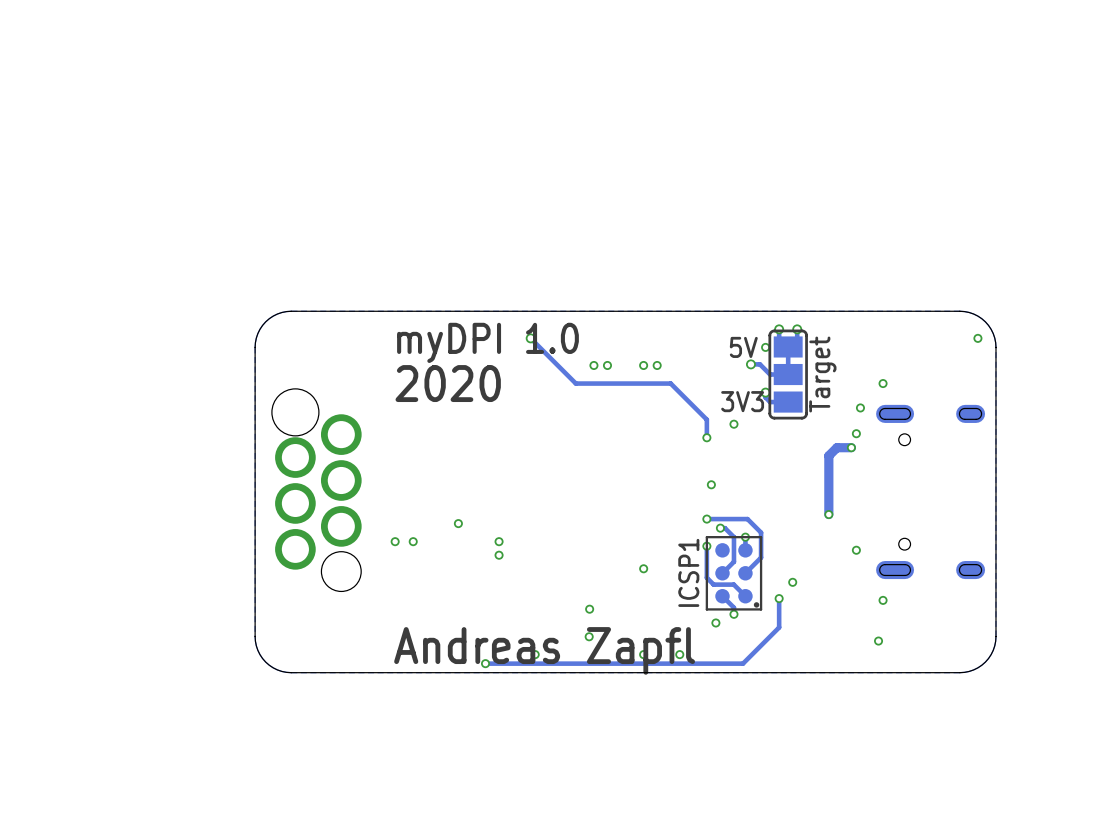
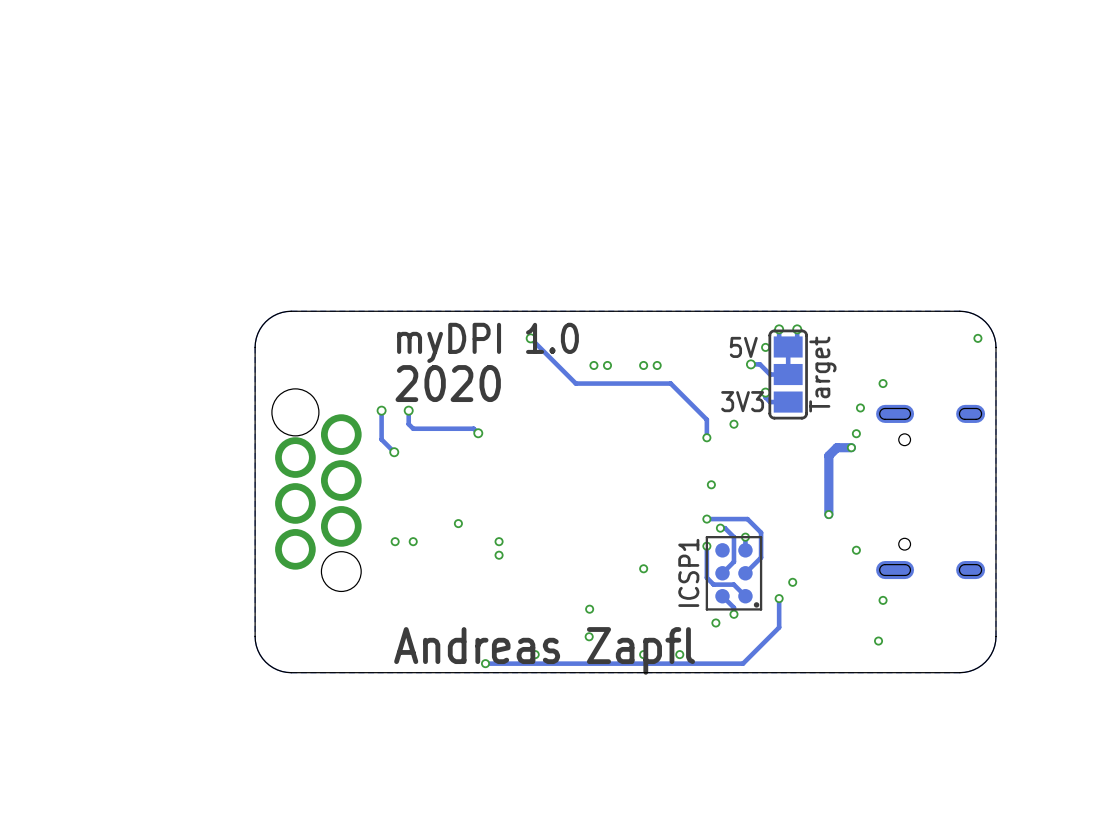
track: none -> (381, 410) (381, 439) (394, 452)
via: none -> (381, 410)
track: none -> (408, 410) (408, 424) (413, 428) (473, 428) (478, 433)
via: none -> (408, 410)
via: none -> (478, 433)
via: none -> (394, 452)

